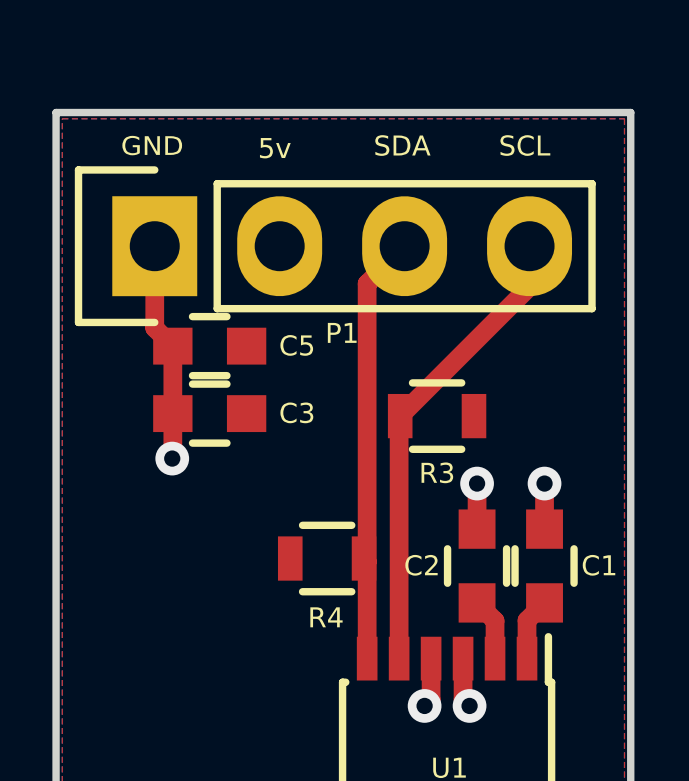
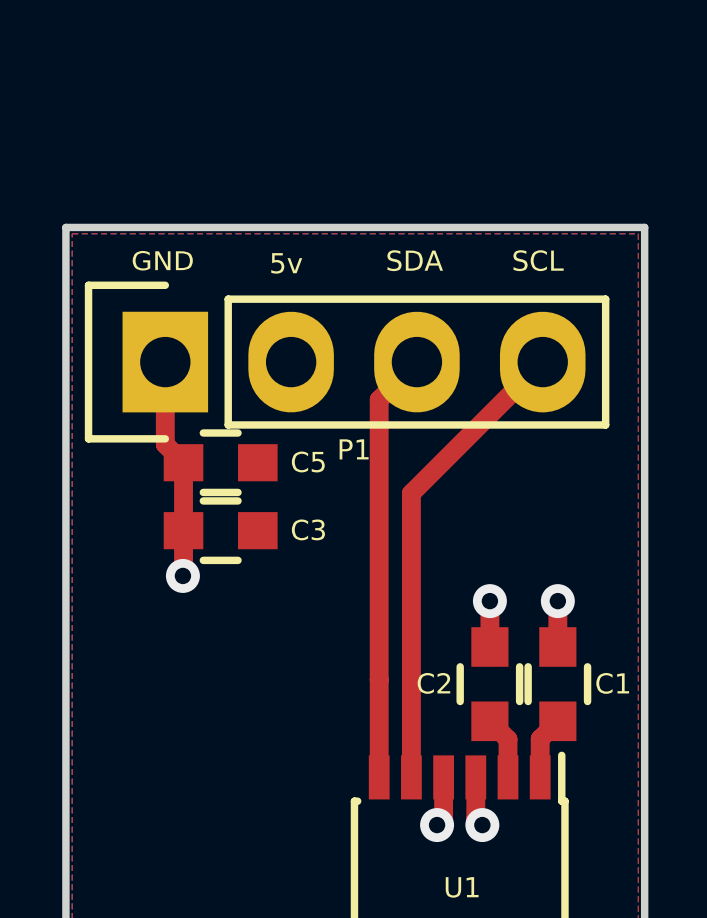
top track: (529, 286) (399, 417) -> (542, 362) (411, 493) (411, 534)
R3: (437, 416) -> none
R4: (327, 558) -> none

